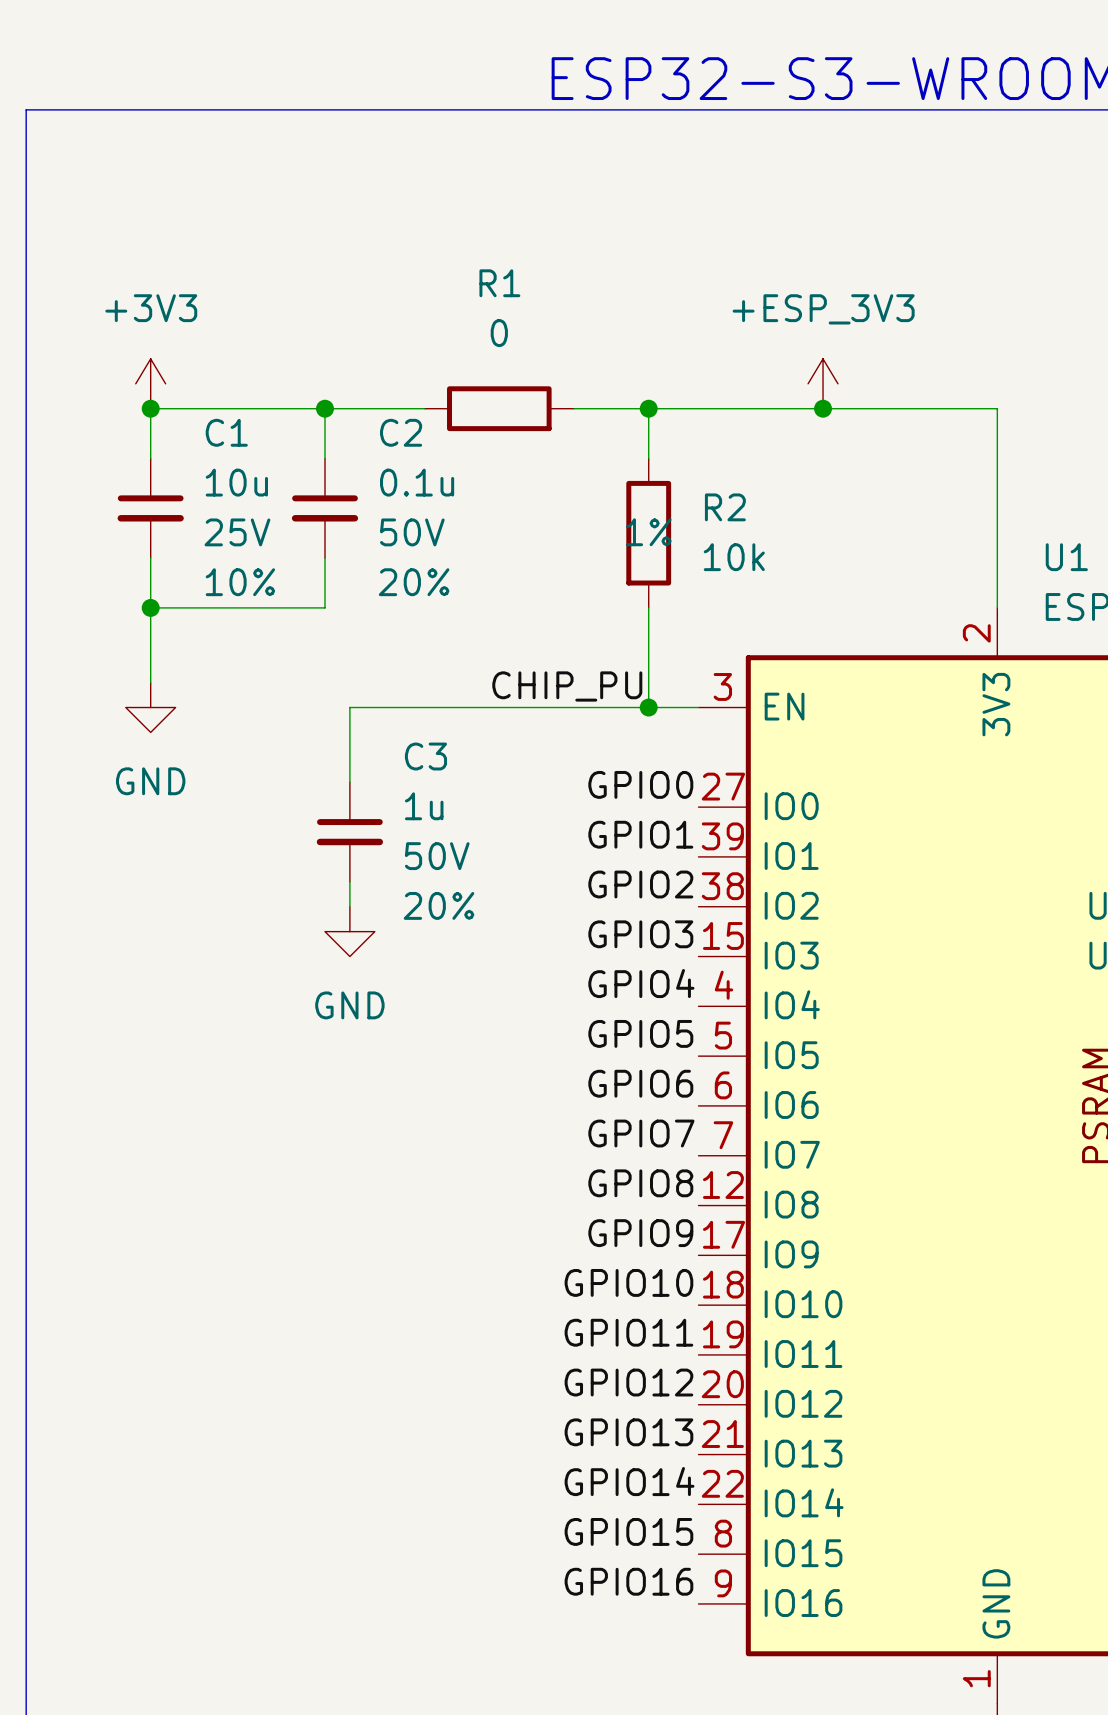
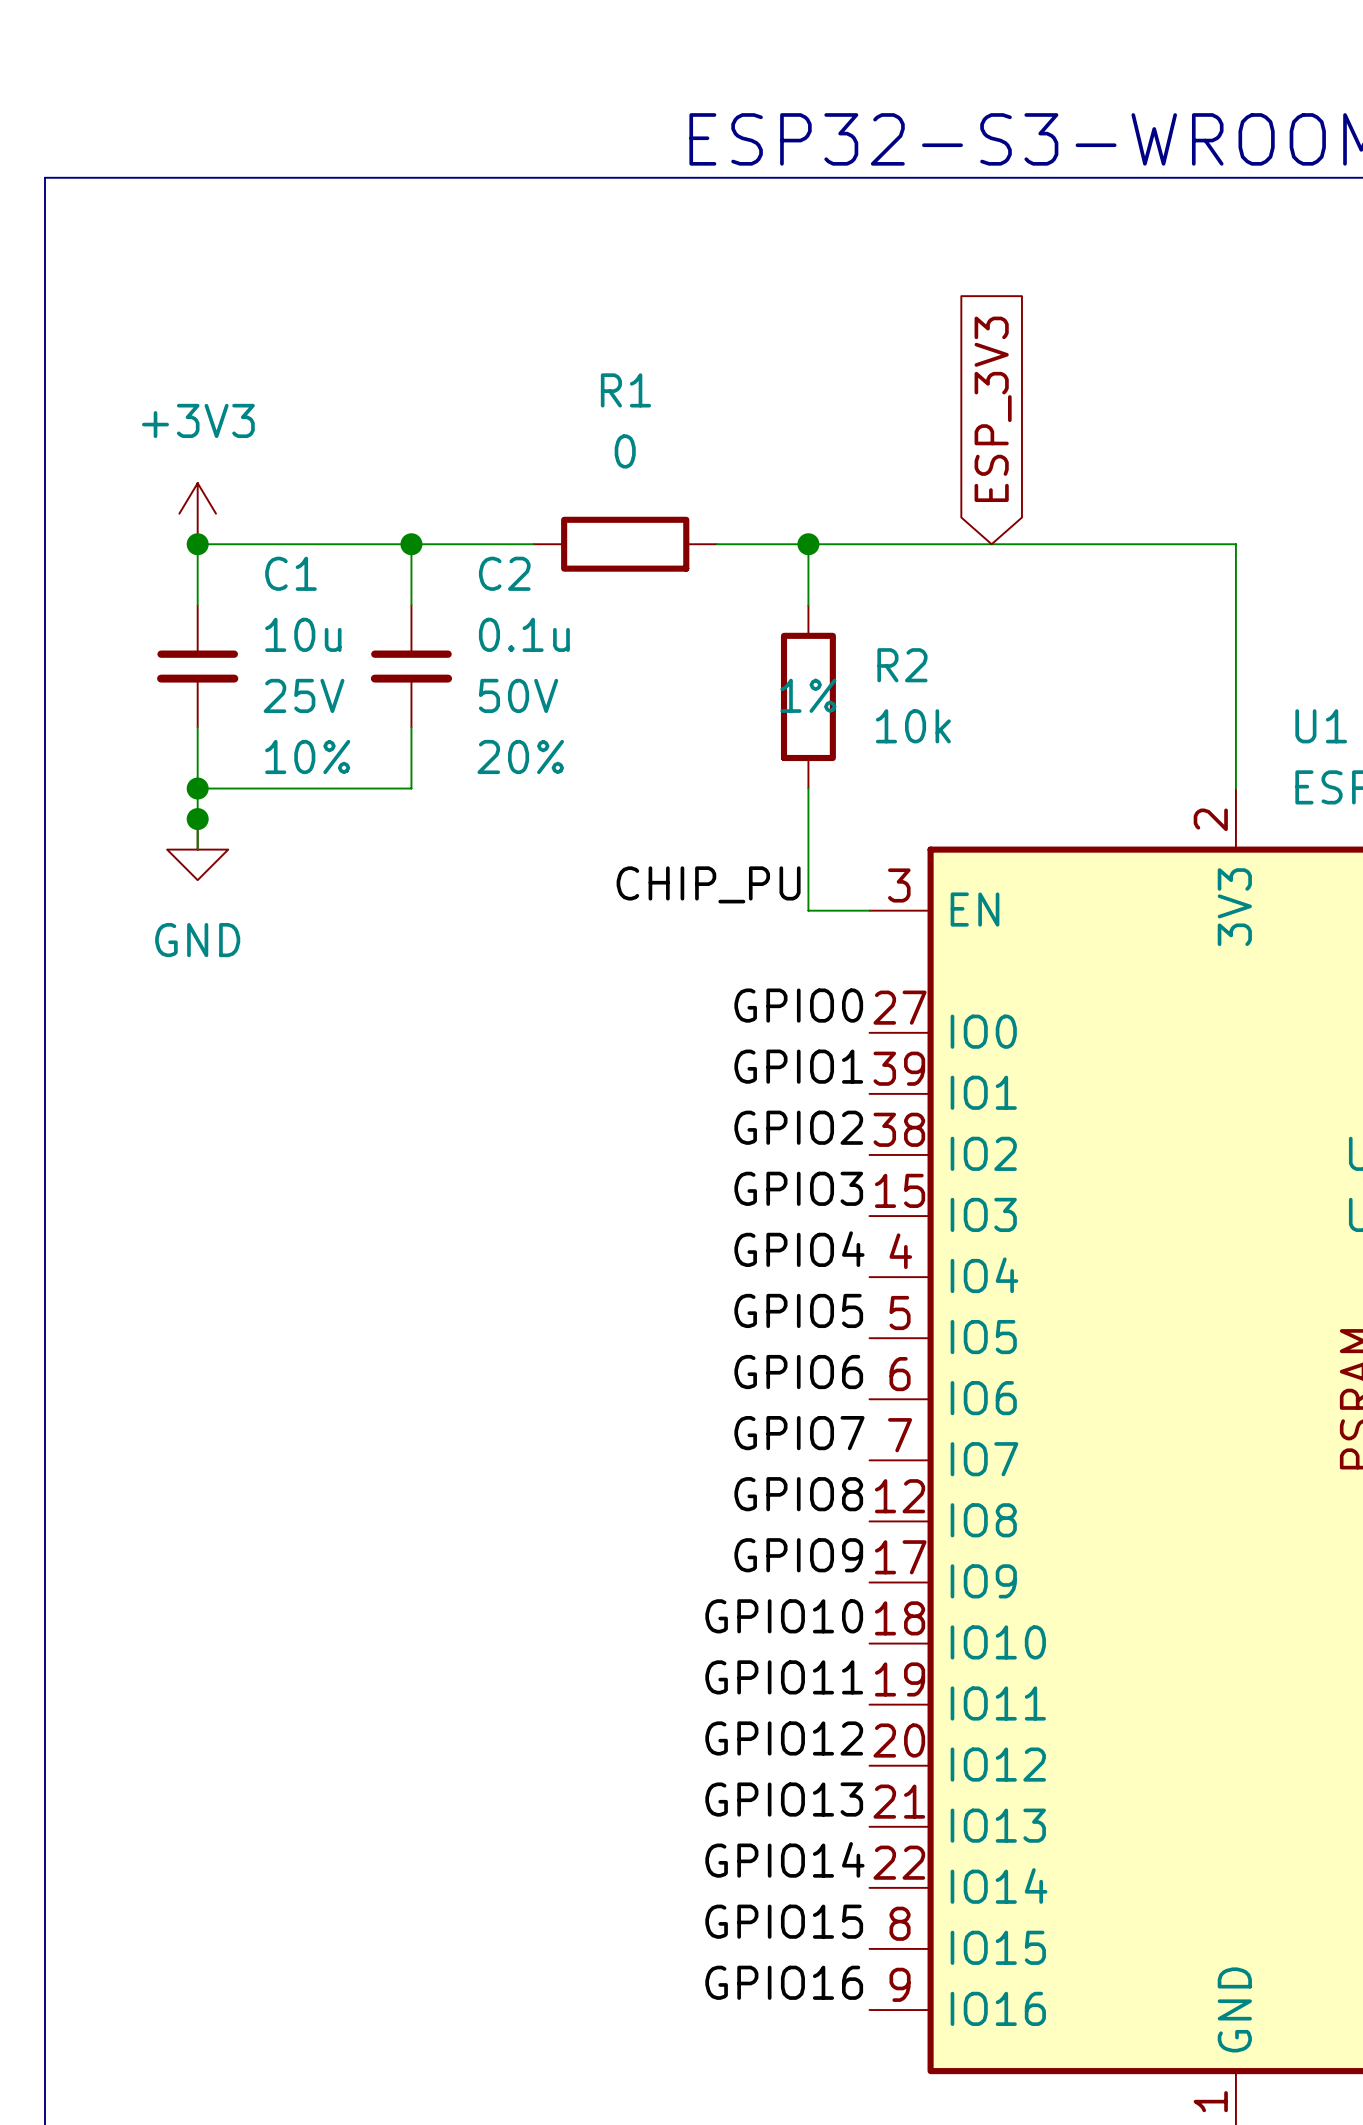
global label: none -> ESP_3V3 (993, 409)
power symbol: +ESP_3V3 (823, 383) -> none
junction: (823, 408) -> none
junction: none -> (197, 819)
wire: (150, 657) (150, 682) -> none
power symbol position: GND (150, 707) -> GND (197, 849)
wire: (648, 707) (349, 707) (349, 782) -> none
junction: (648, 707) -> none
C3: 1u (349, 832) -> none
wire: (349, 881) (349, 906) -> none
power symbol: GND (349, 931) -> none

